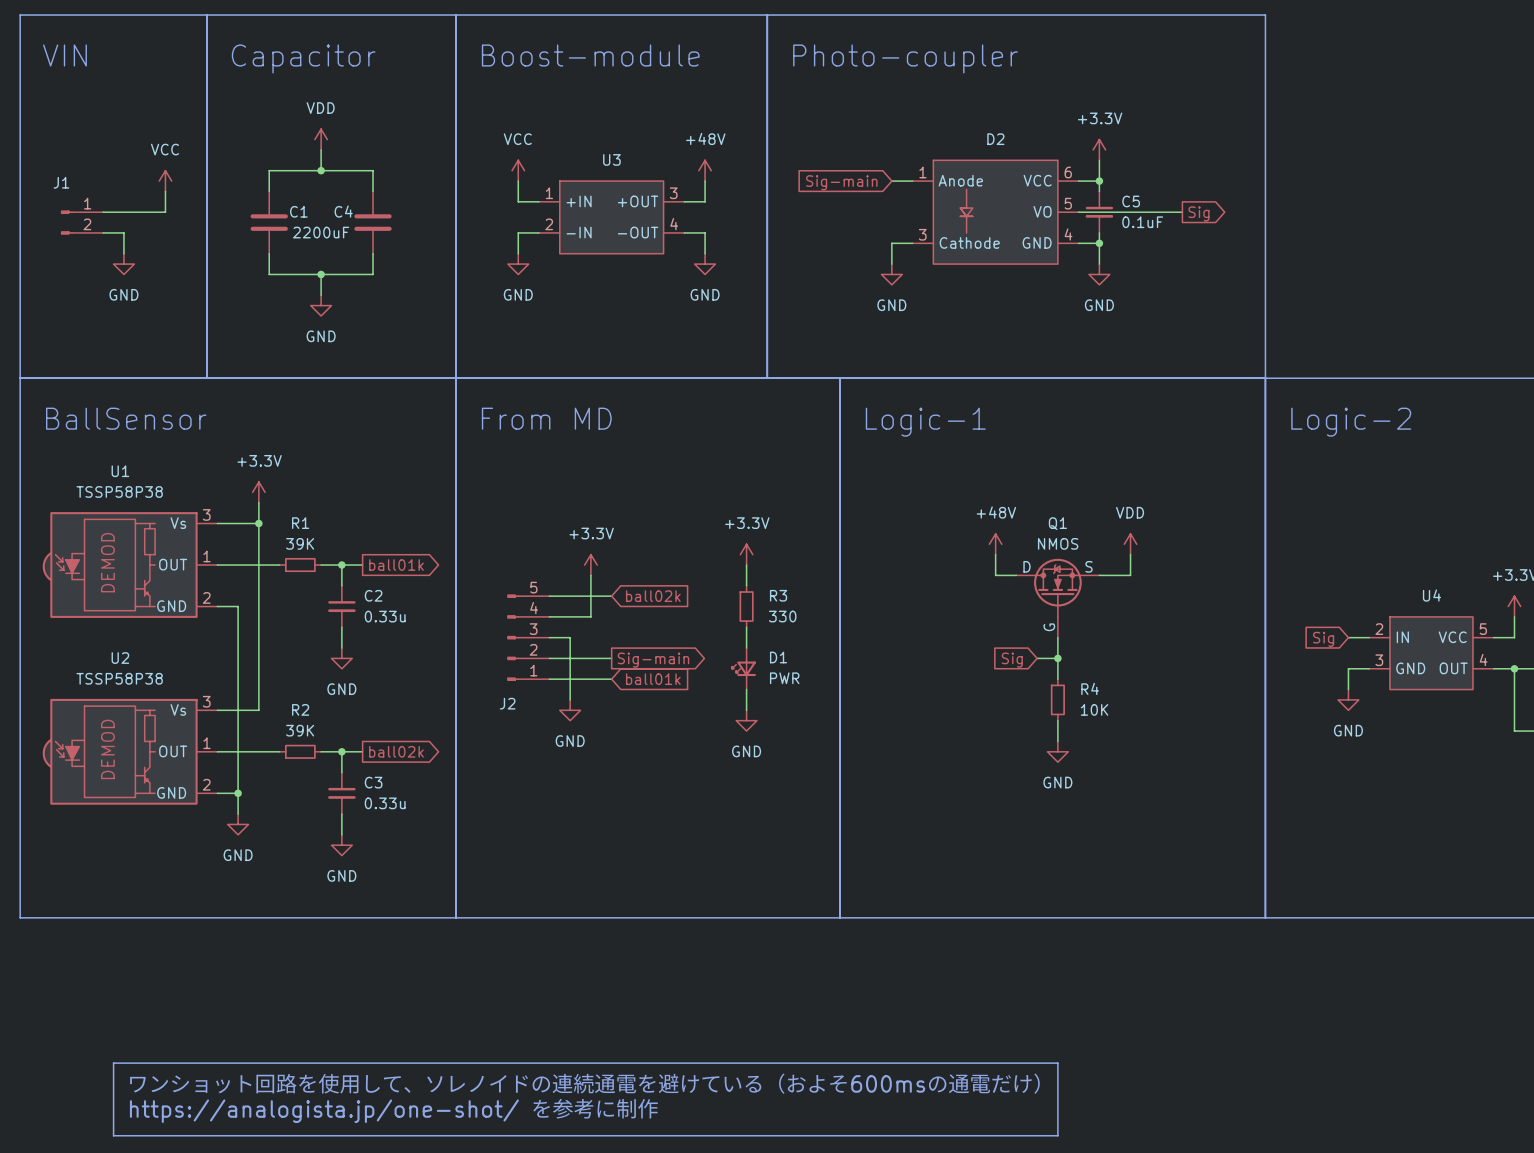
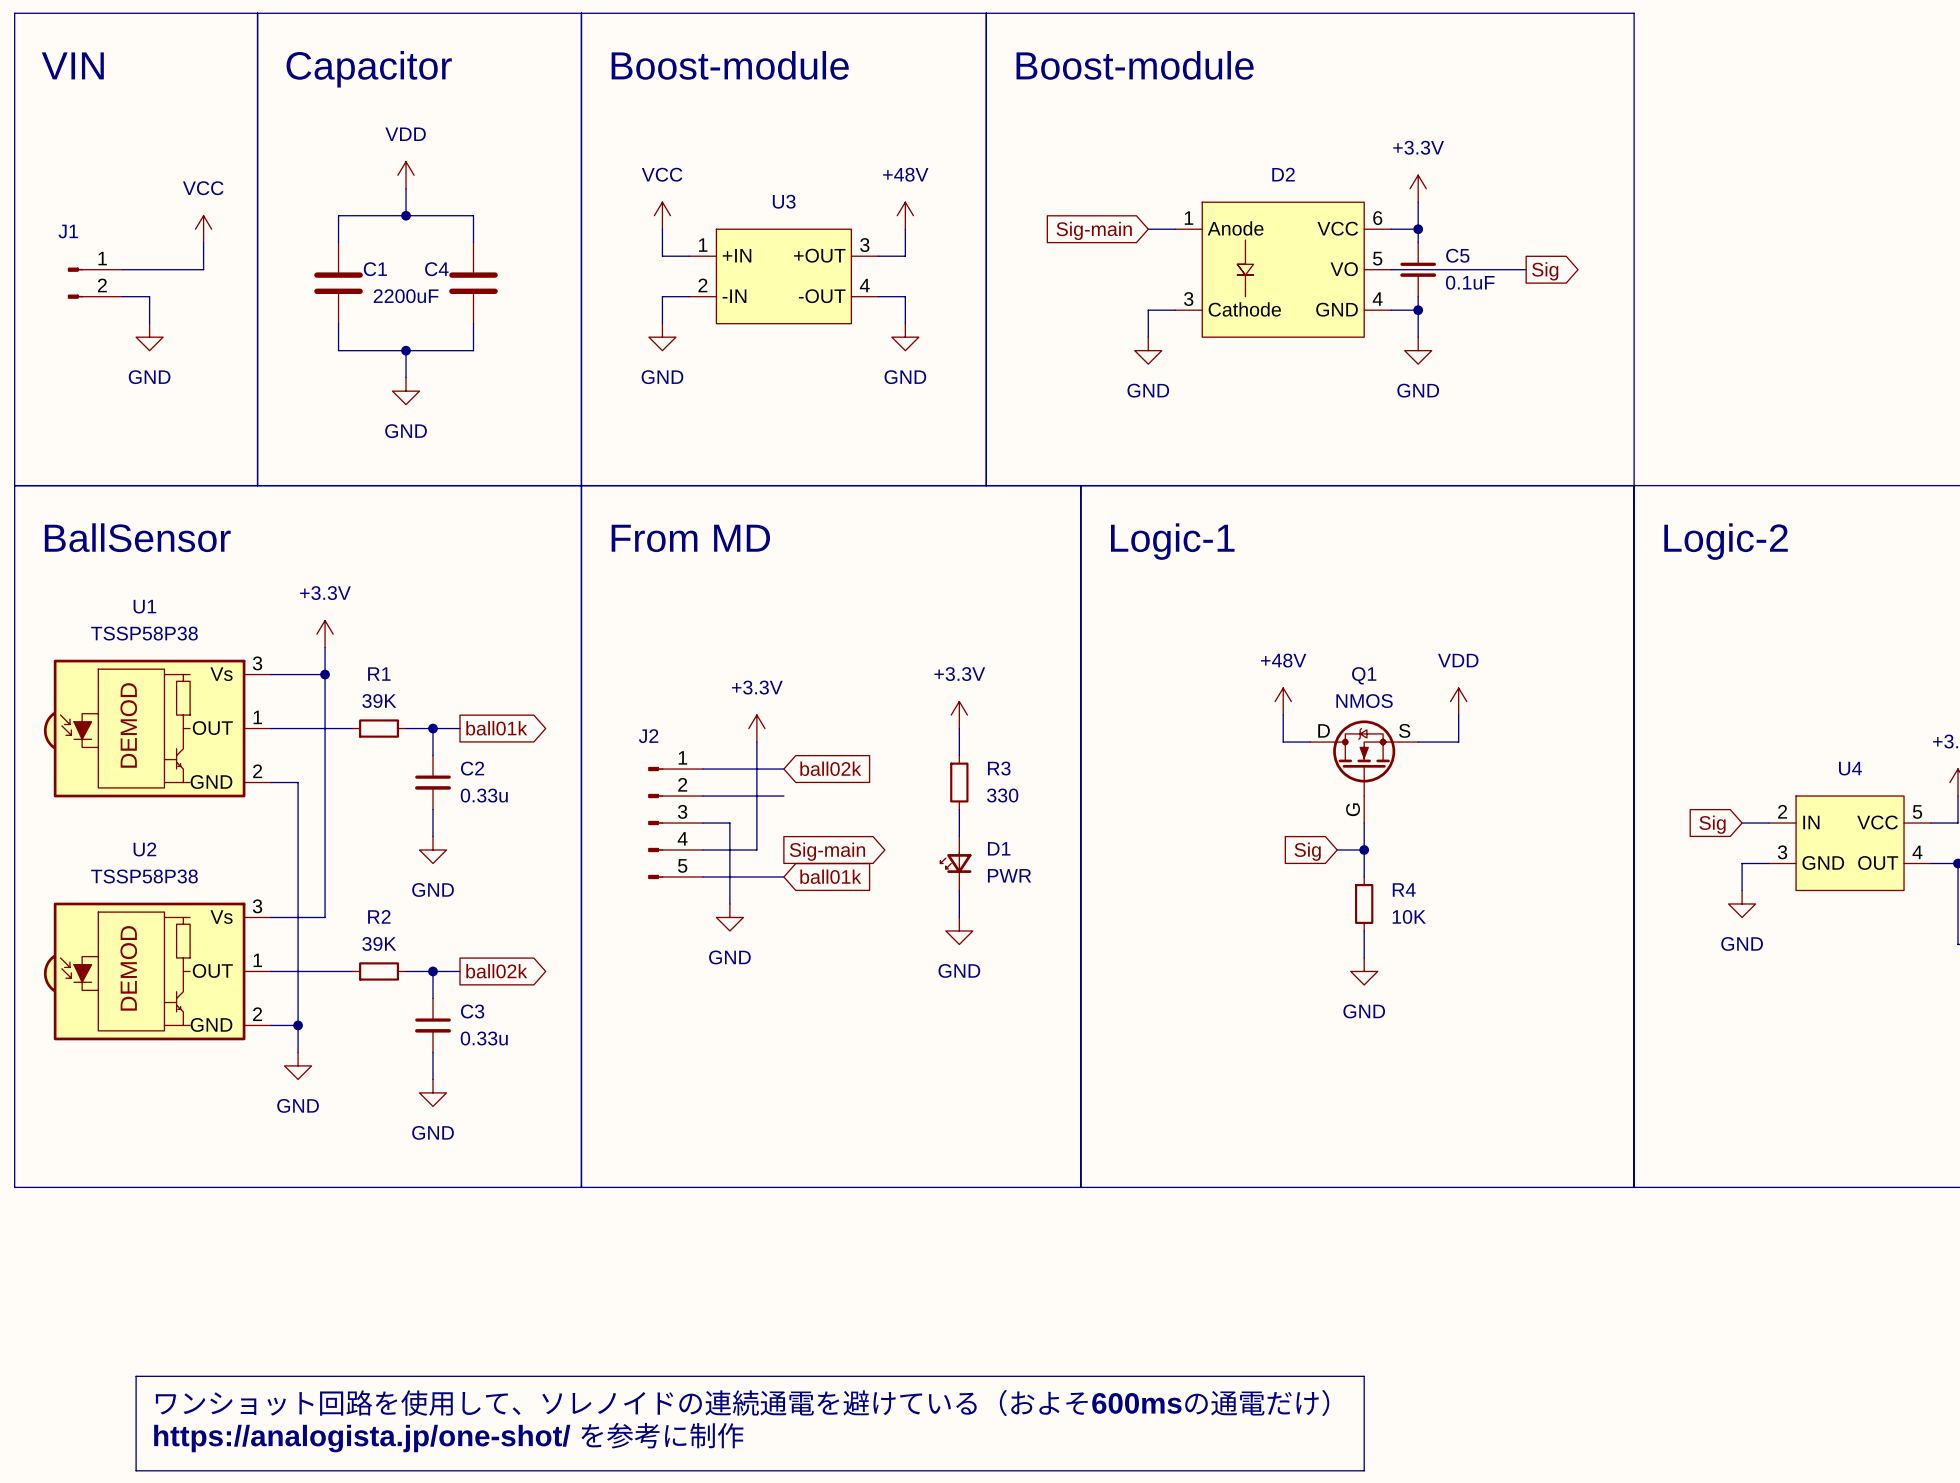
text: Photo-coupler (905, 58) -> Boost-module (1135, 65)
J2 flip: as is (513, 637) -> up-down (655, 823)
wire: (590, 658) (611, 658) -> (756, 850) (756, 796) (783, 796)

